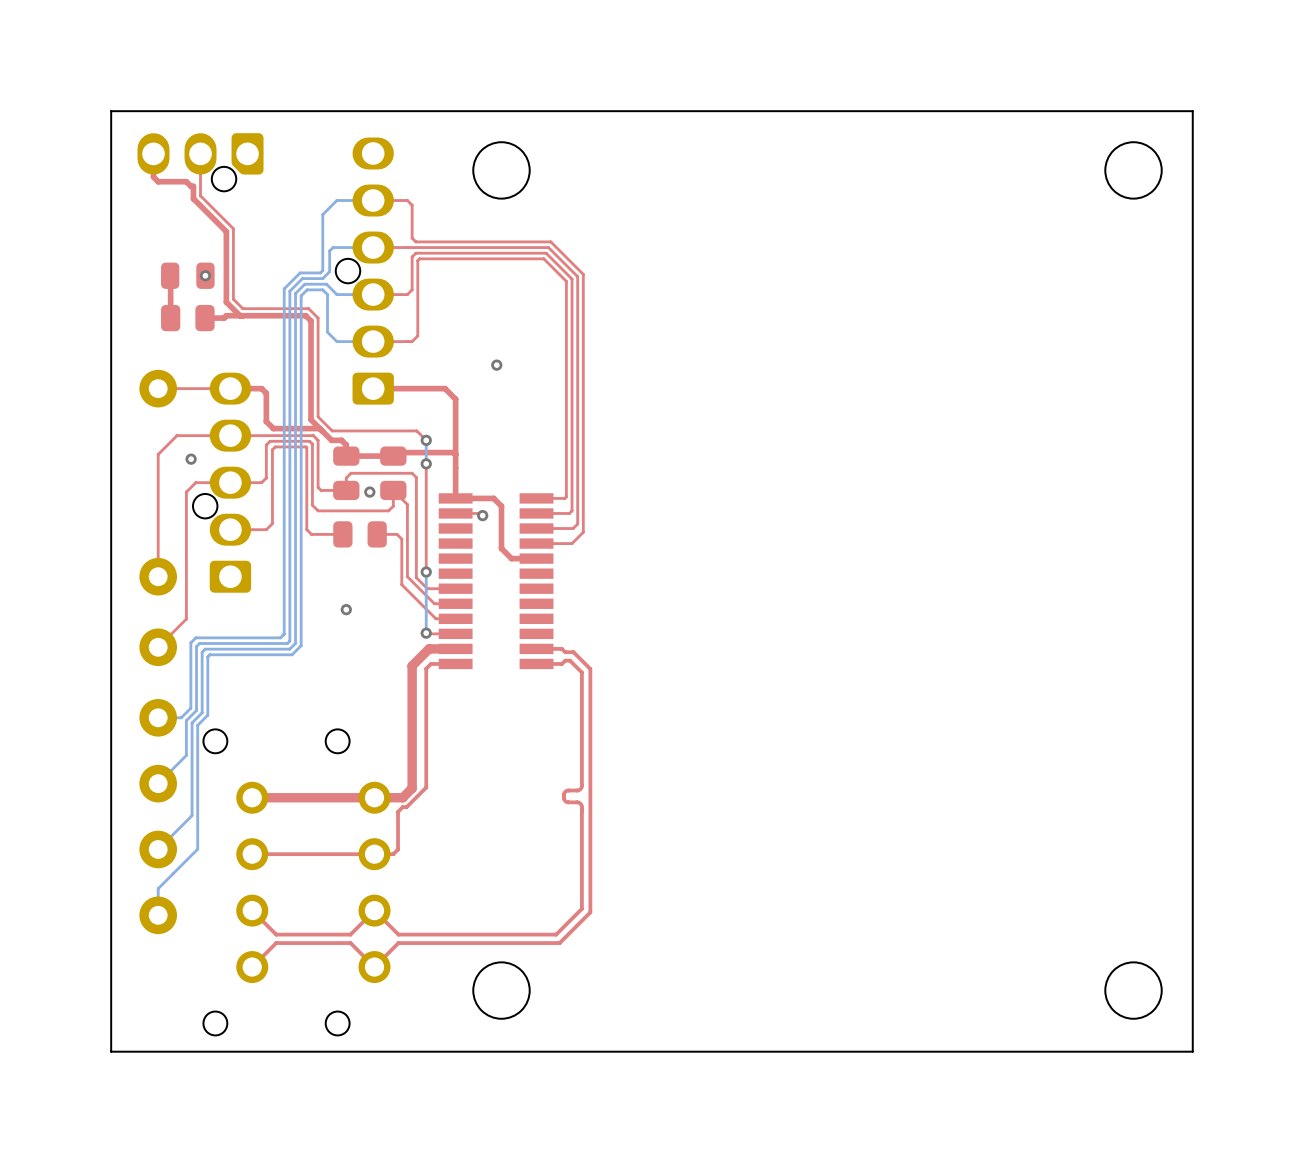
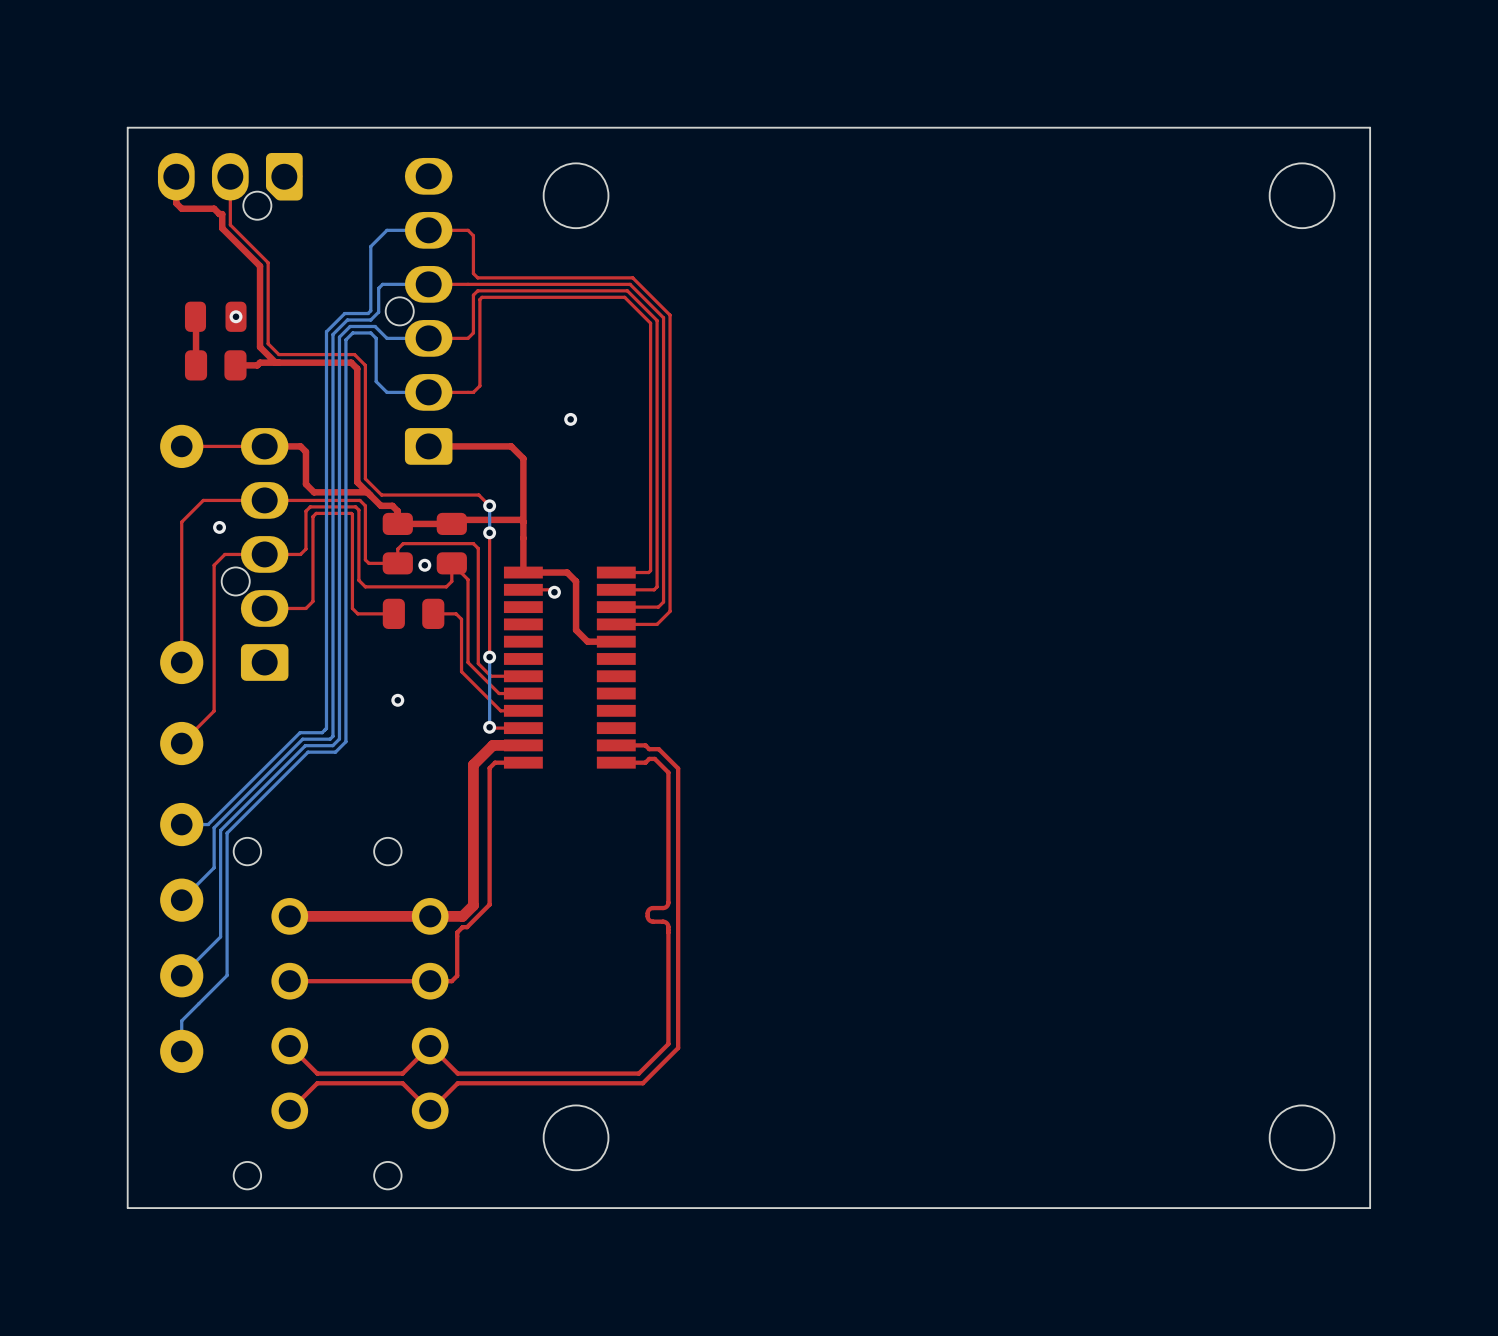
bottom track: (261, 637) (195, 637) (190, 642) (190, 708) -> (300, 732) (219, 813)
bottom track: (263, 643) (199, 643) (196, 646) (196, 710) -> (302, 739) (225, 816)
bottom track: (265, 649) (205, 649) (202, 652) (202, 712) -> (305, 745) (232, 818)
bottom track: (268, 654) (209, 654) (207, 656) (207, 715) -> (308, 752) (238, 821)

